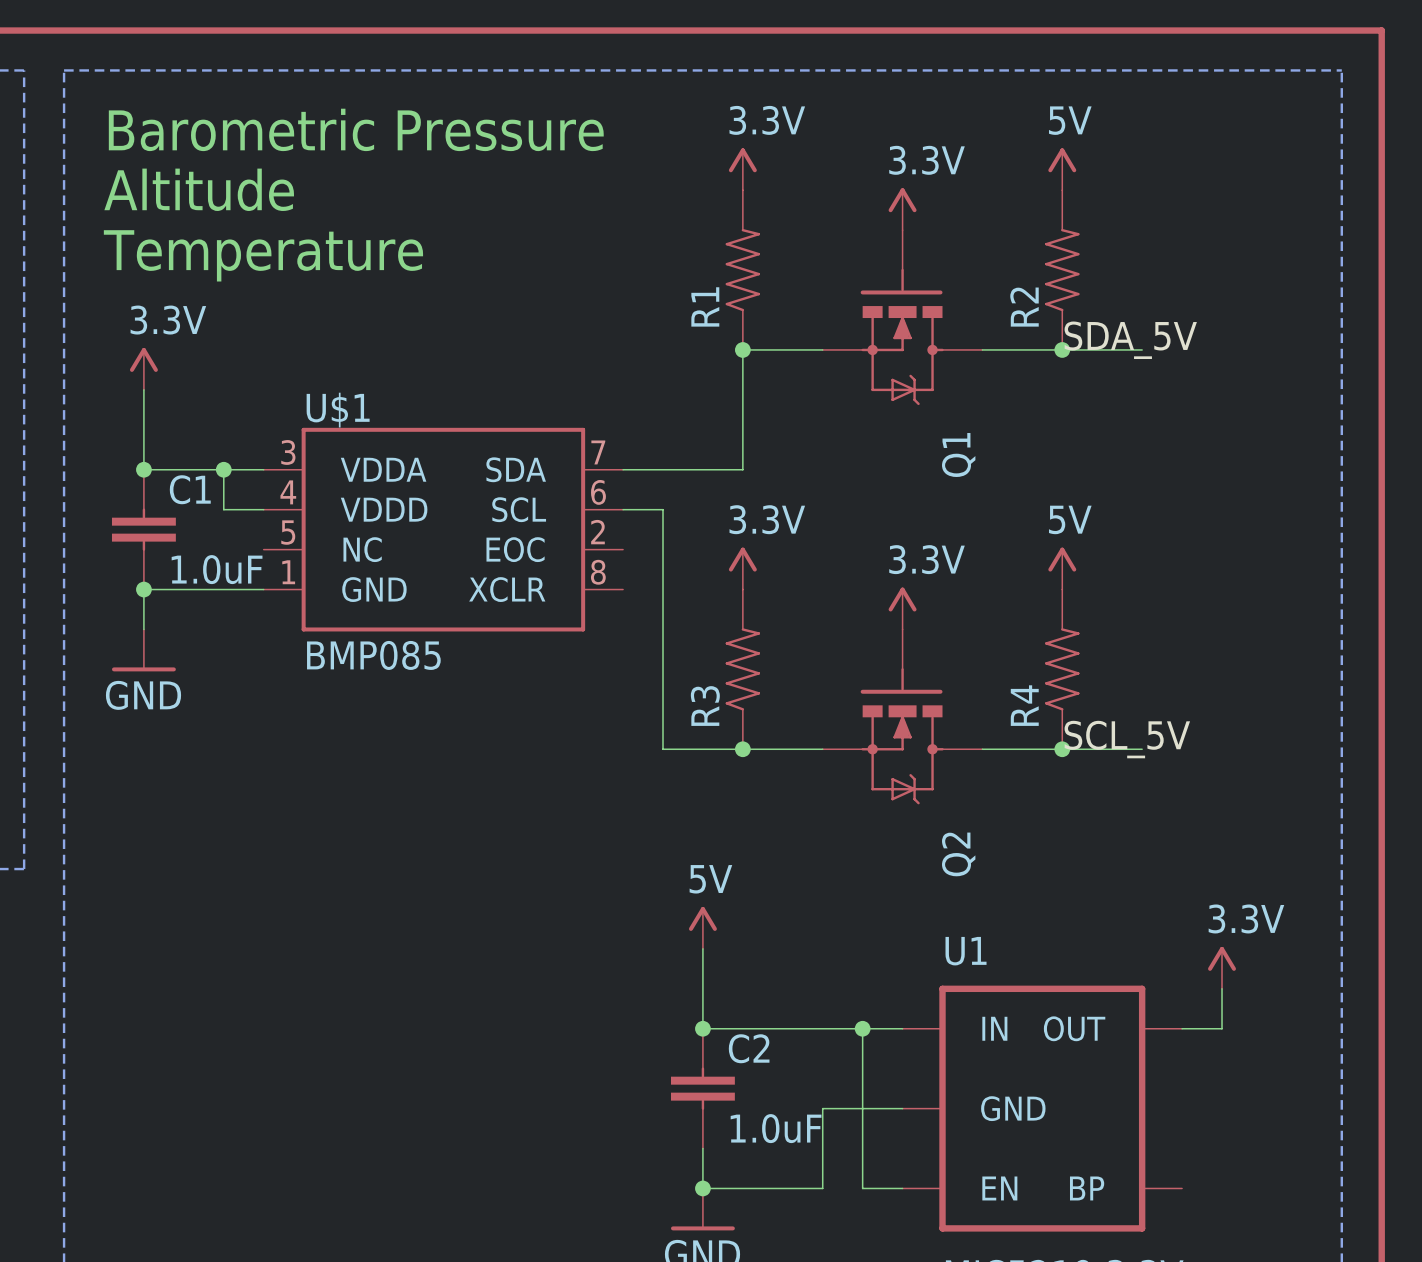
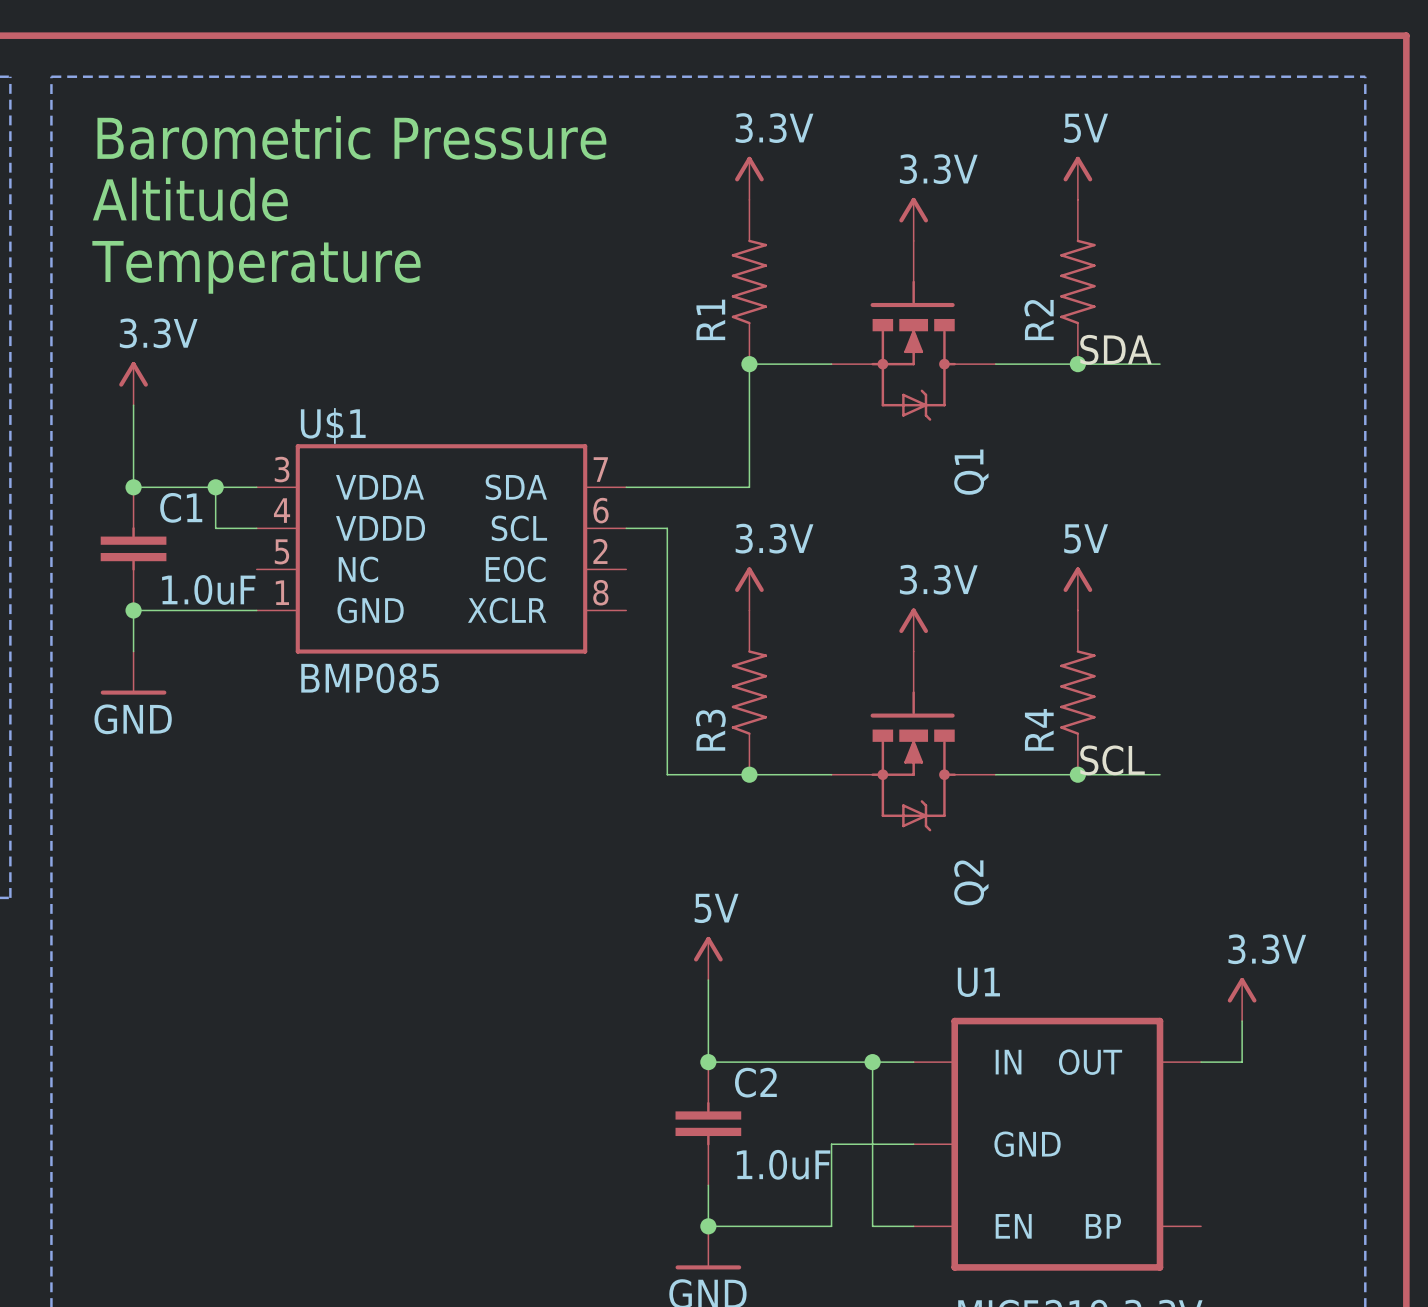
label: SDA_5V (1130, 340) -> SDA (1115, 349)
label: SCL_5V (1127, 739) -> SCL (1112, 760)

